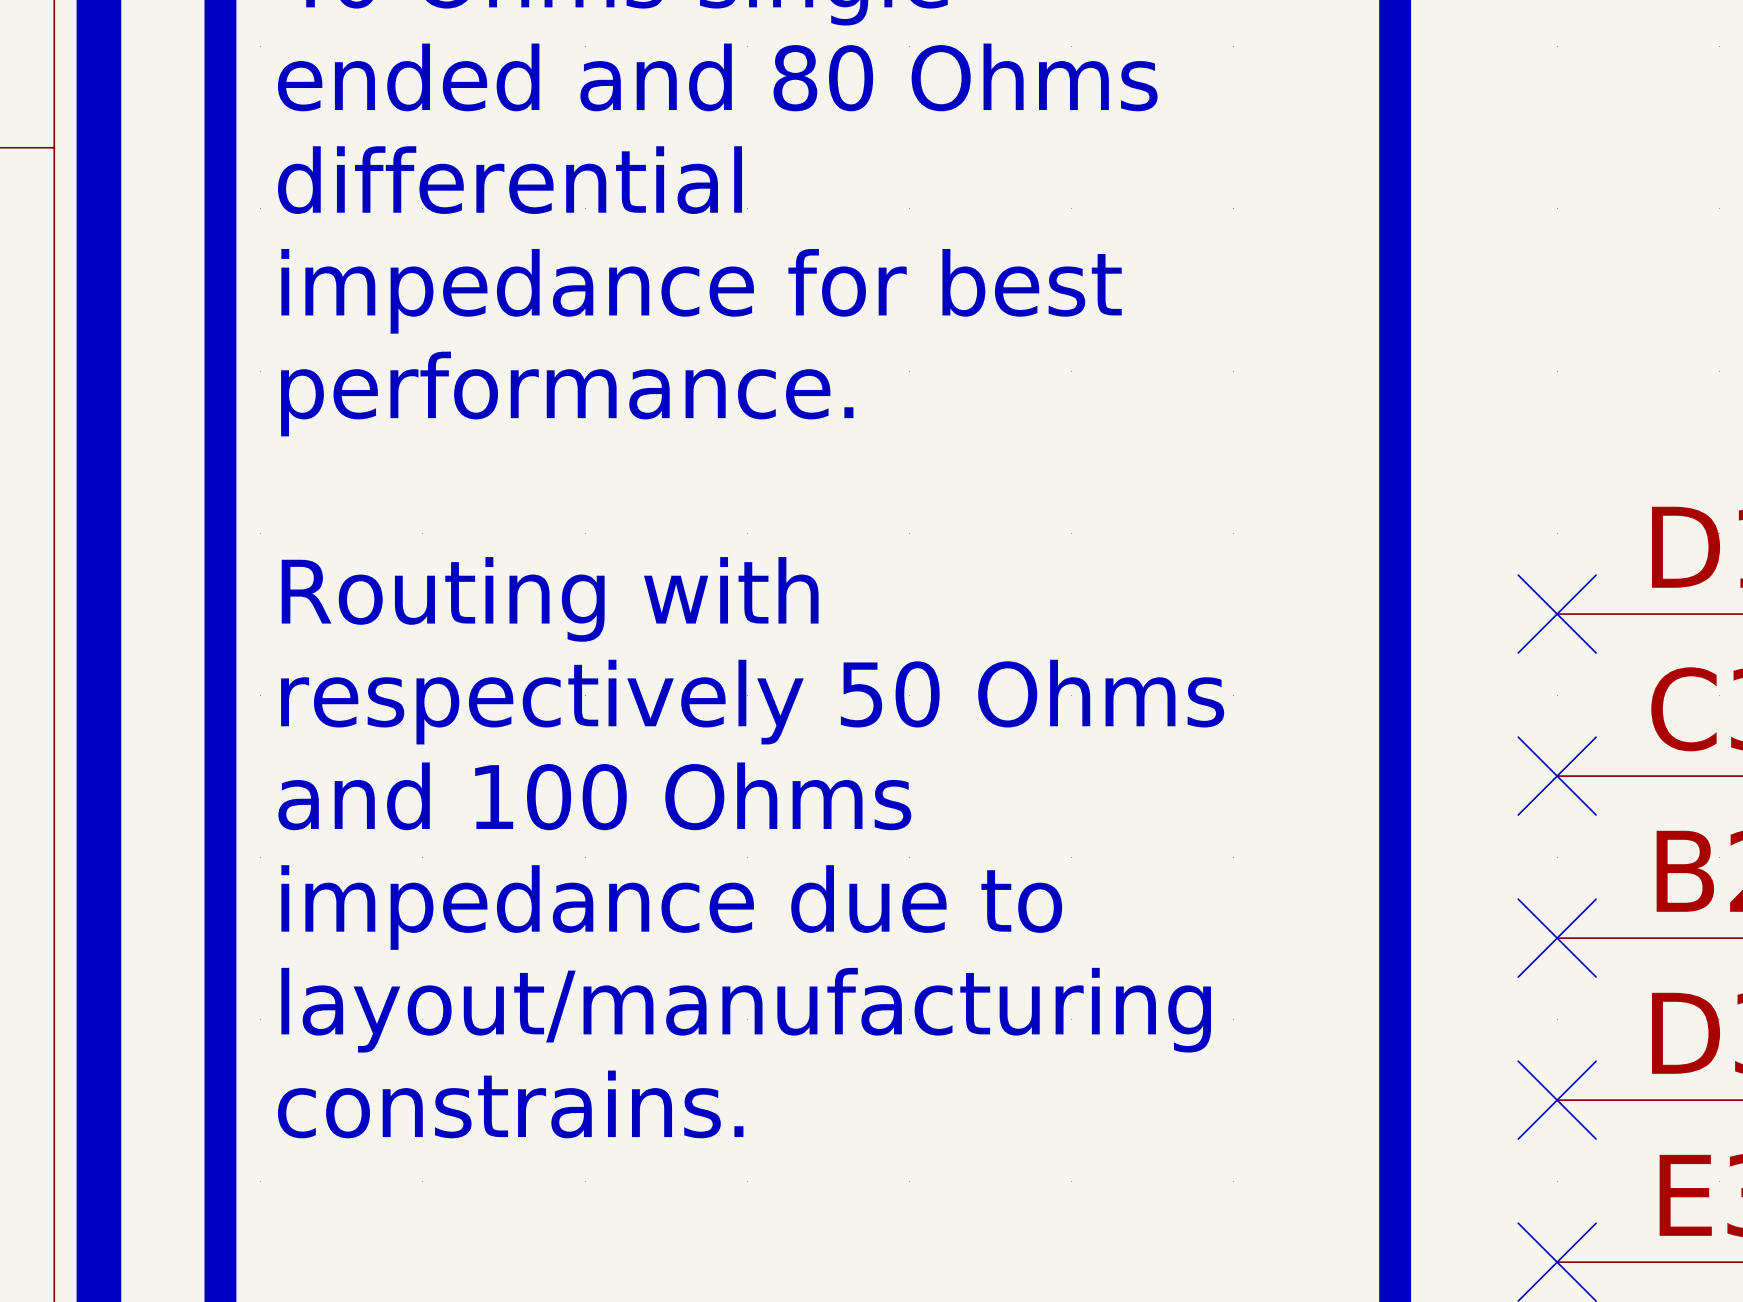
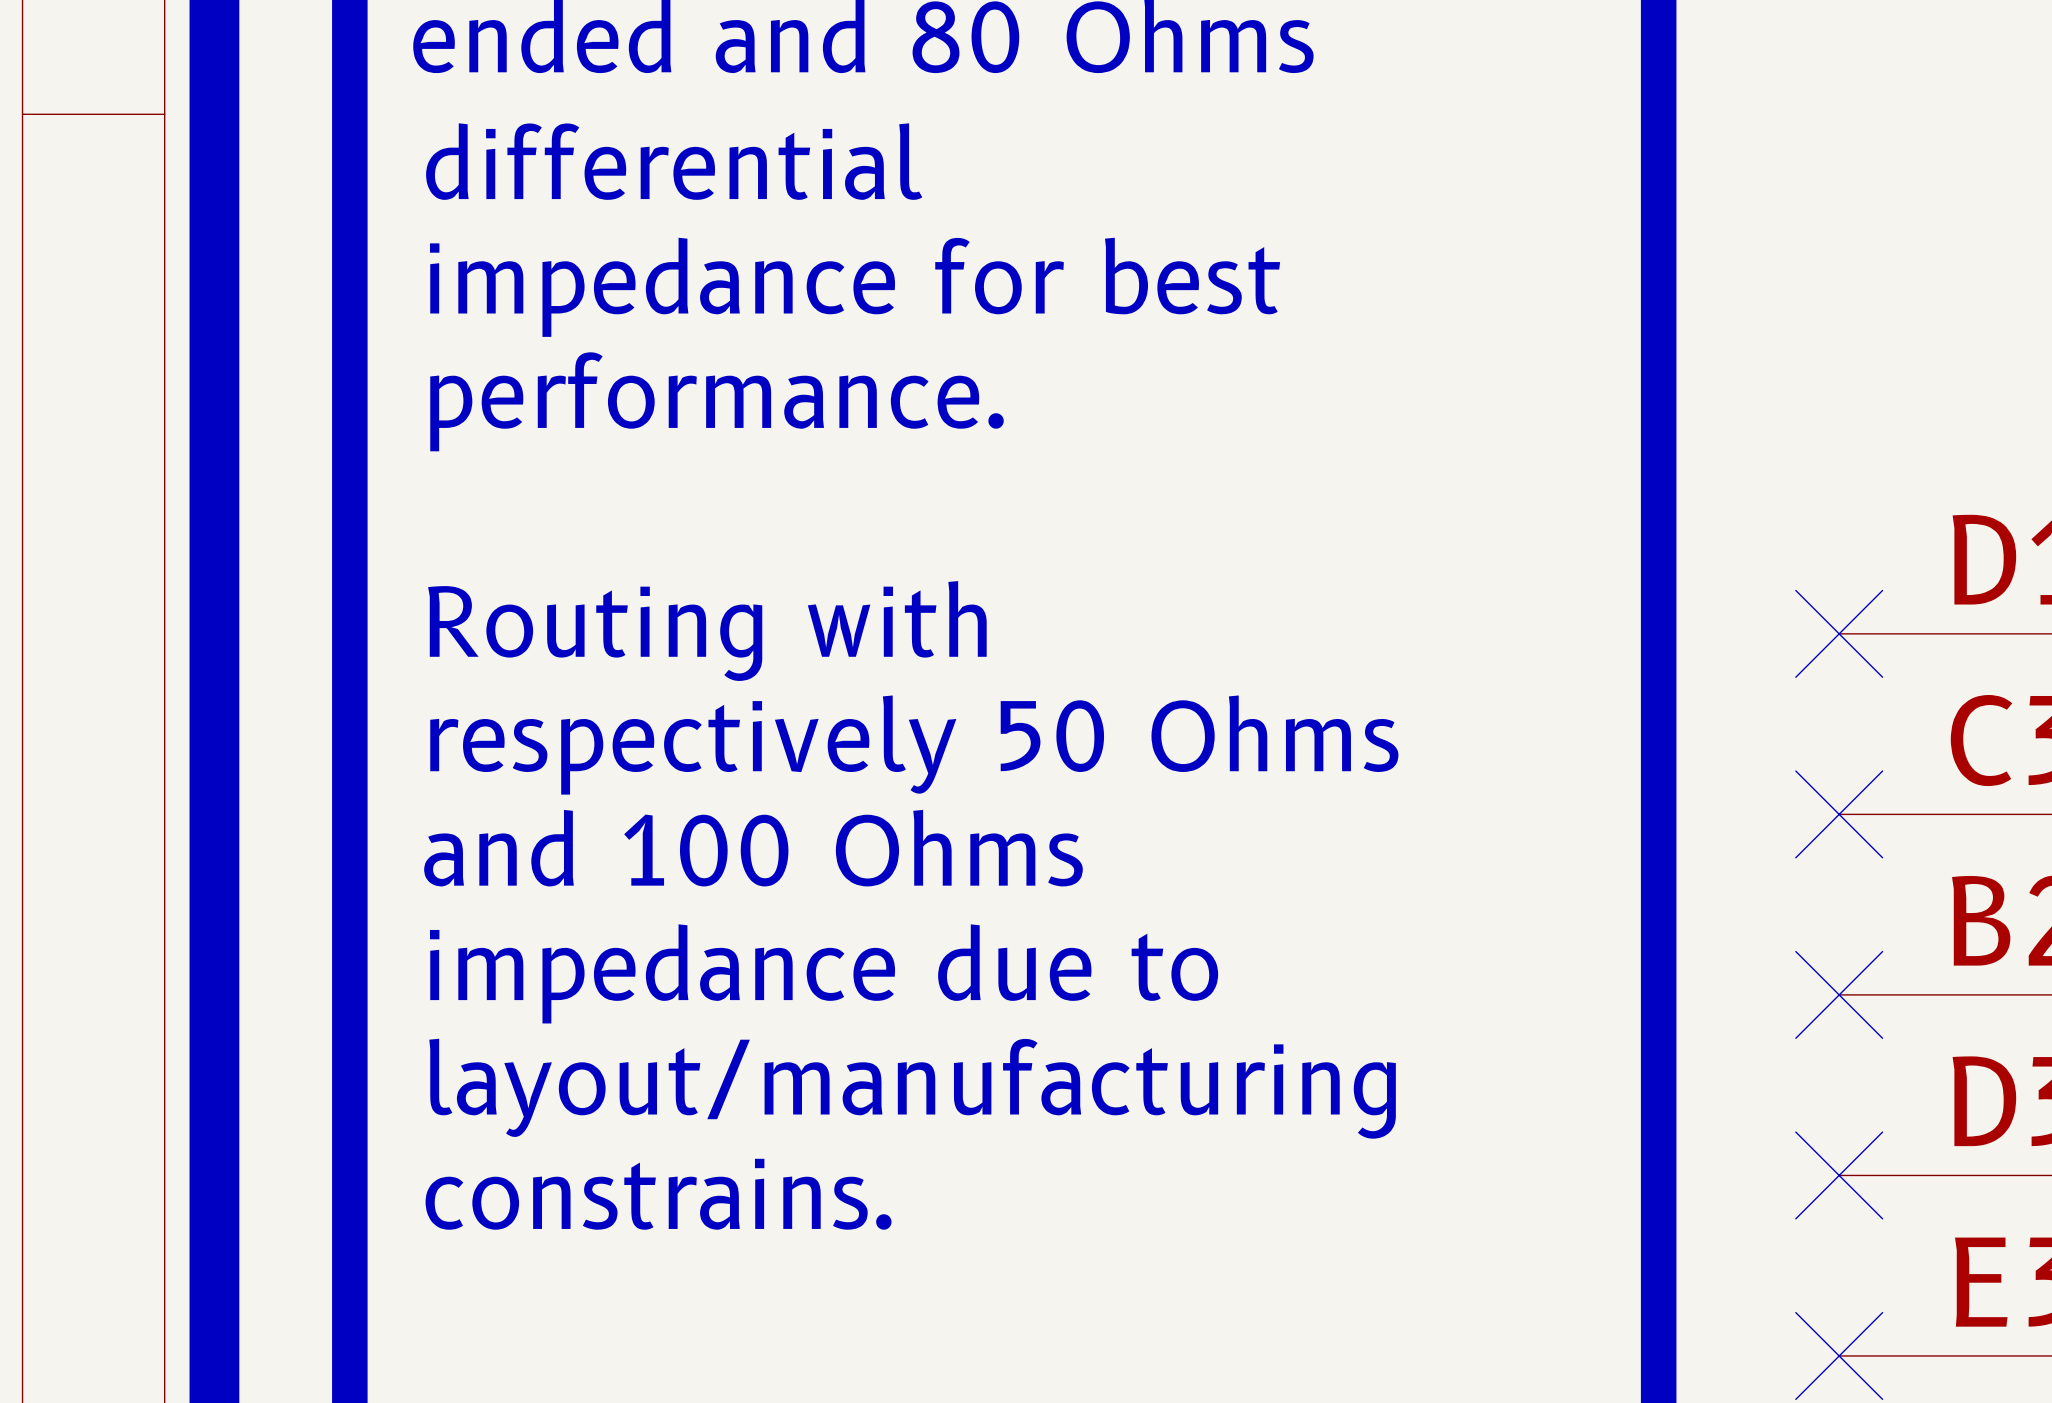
text position: differential (510, 180) -> differential (674, 161)
text position: impedance for best (701, 291) -> impedance for best (855, 287)
text position: performance. (567, 394) -> performance. (717, 401)
text position: Routing with (550, 599) -> Routing with (707, 631)
text position: respectively 50 Ohms (752, 702) -> respectively 50 Ohms (914, 745)
text position: and 100 Ohms (594, 796) -> and 100 Ohms (753, 848)
text position: impedance due to (671, 907) -> impedance due to (824, 973)
text position: layout/manufacturing (746, 1010) -> layout/manufacturing (912, 1088)
text position: constrains. (510, 1104) -> constrains. (658, 1194)

